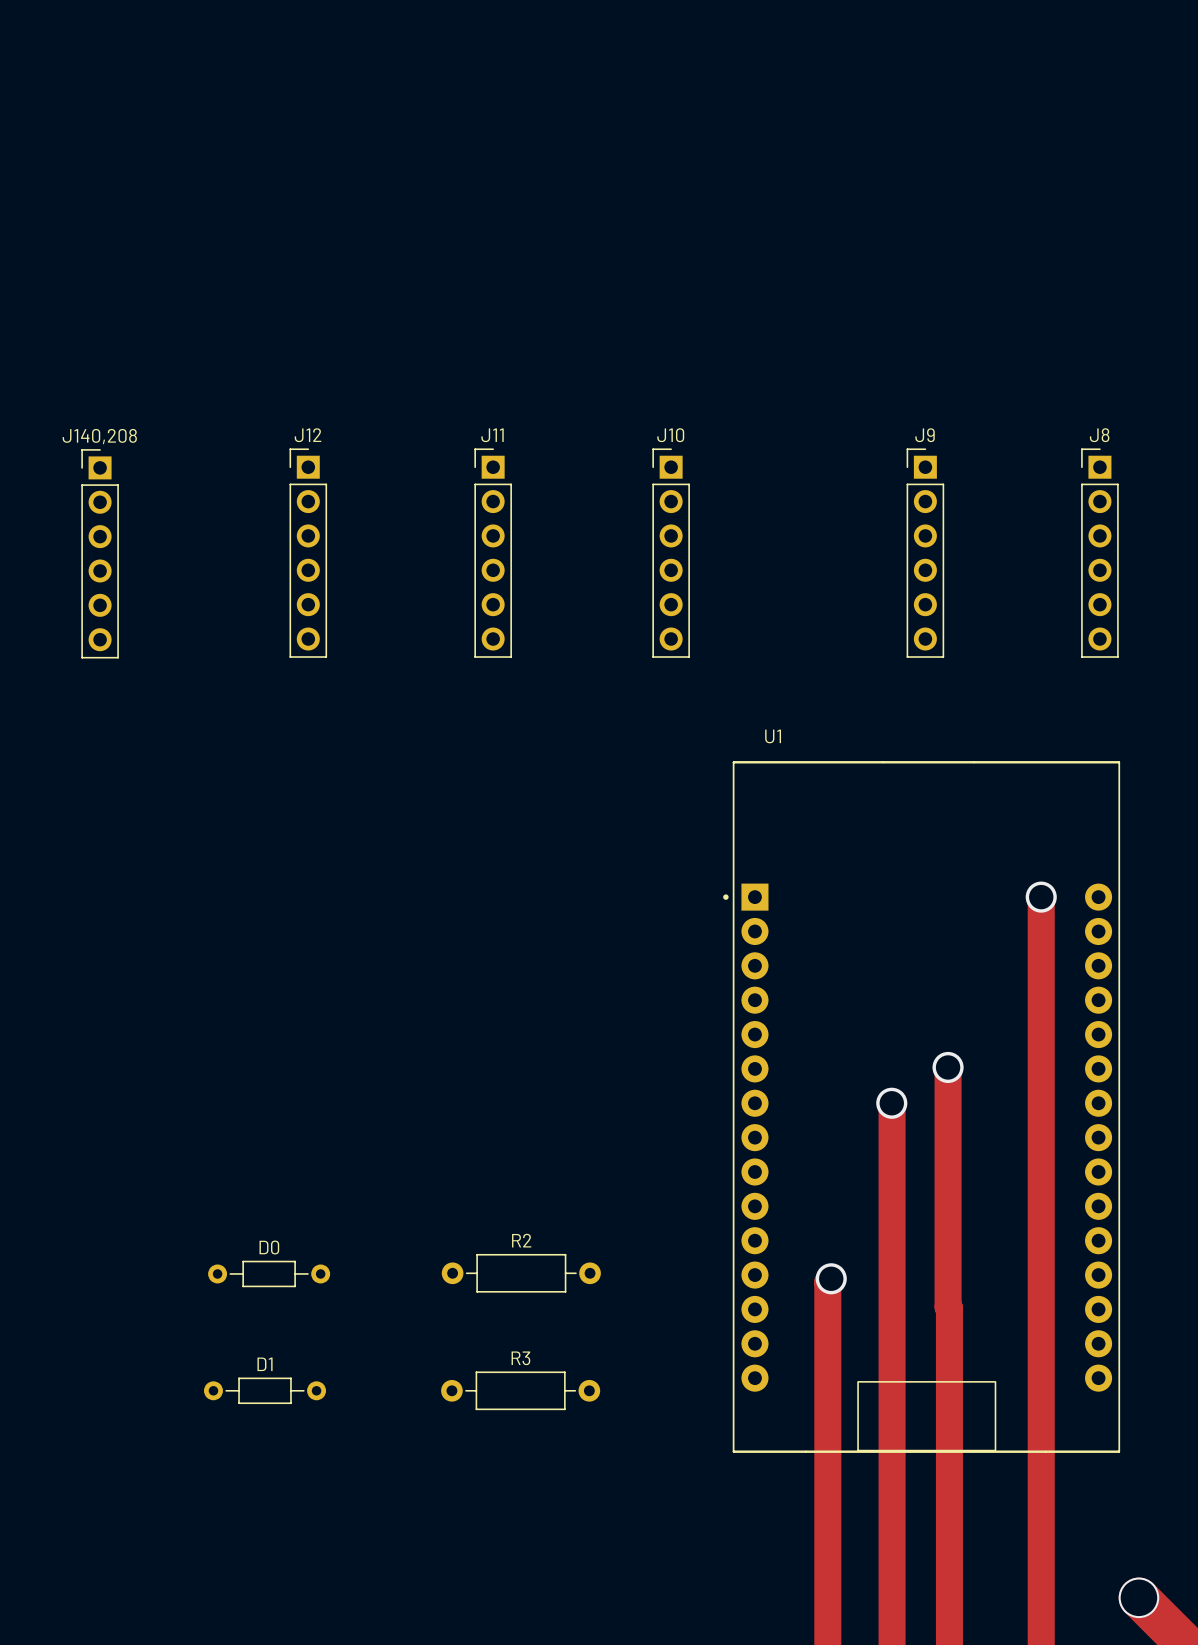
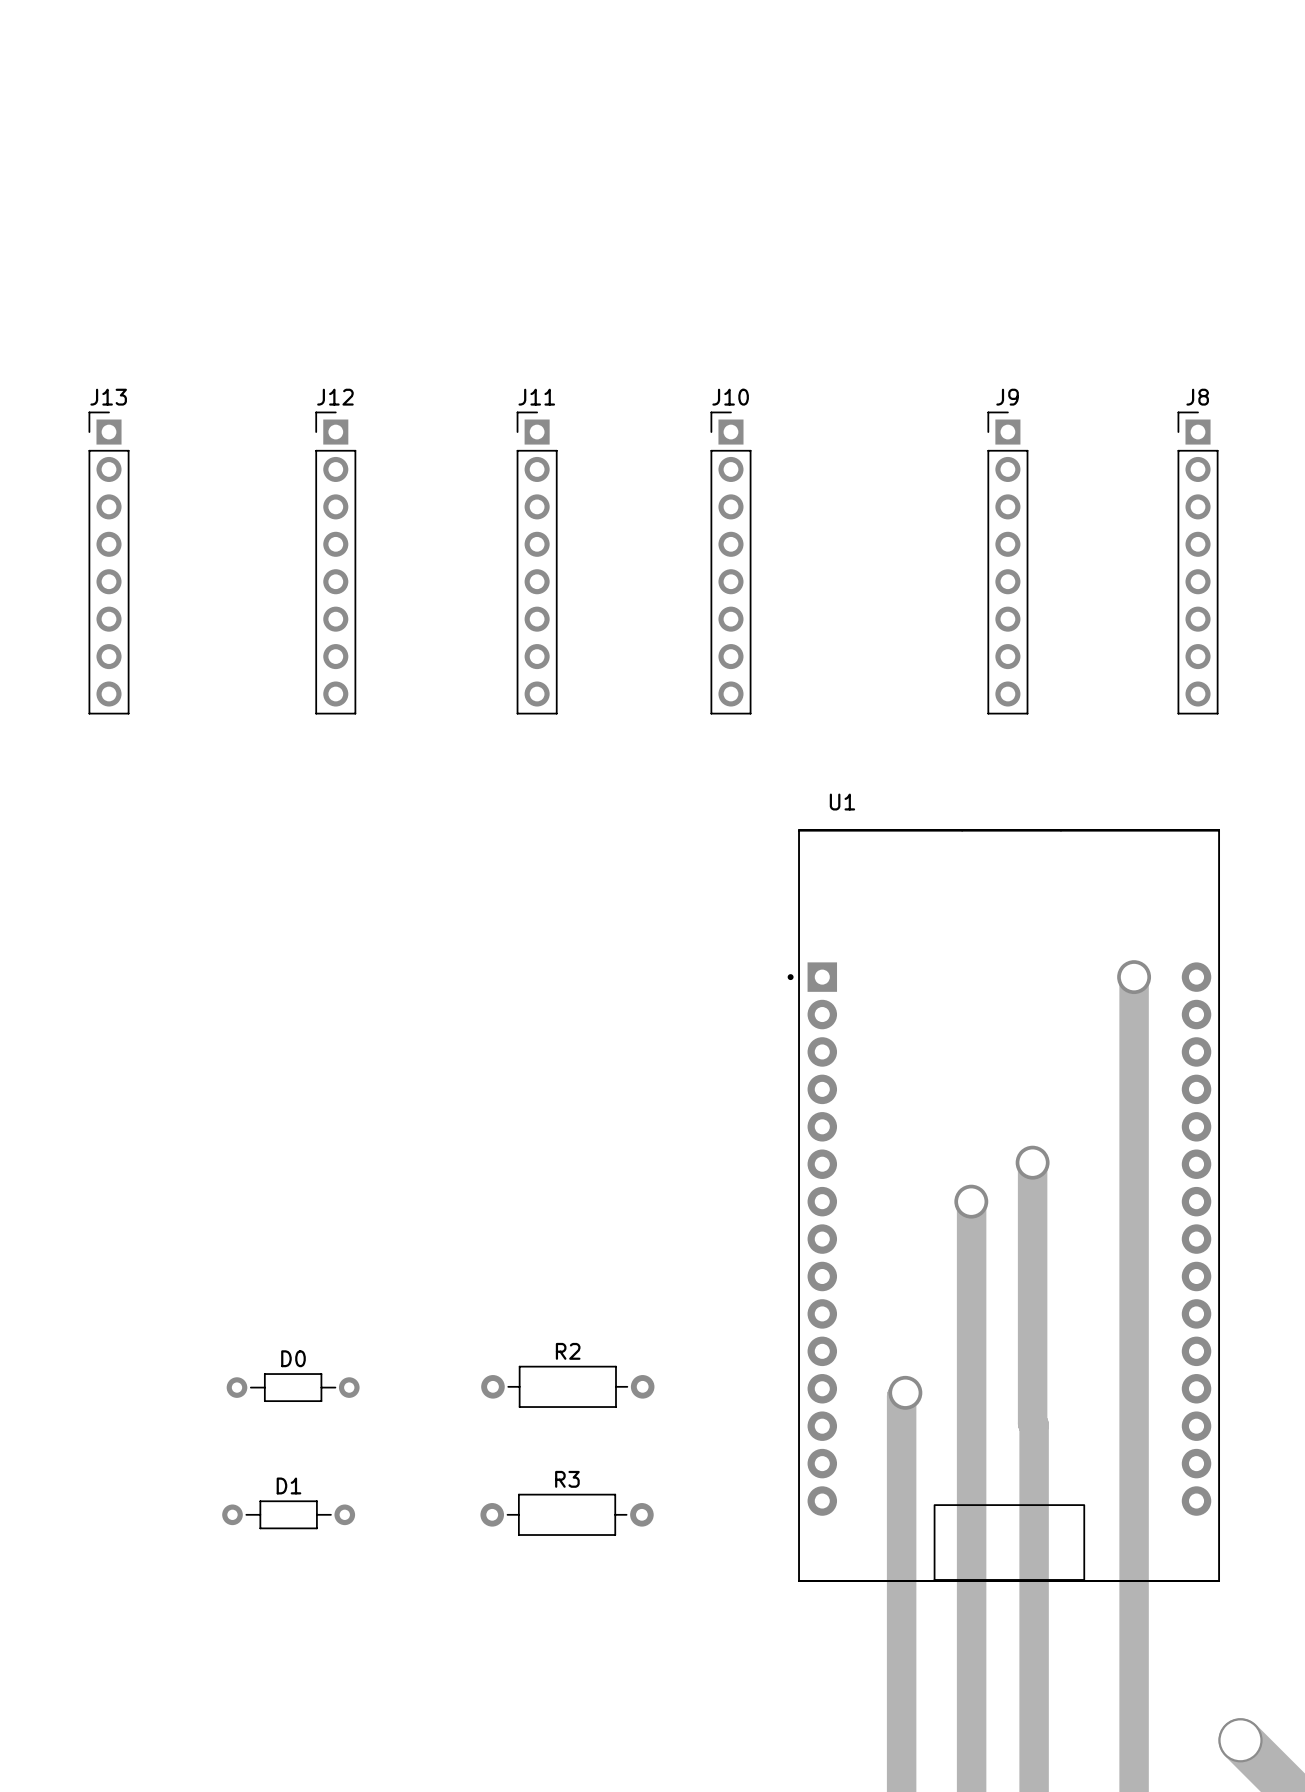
J12 name position: J12 (308, 435) -> J12 (335, 397)
J11 name position: J11 (492, 435) -> J11 (536, 397)
J10 name position: J10 (670, 435) -> J10 (730, 397)
J9 name position: J9 (925, 435) -> J9 (1007, 397)
J8 name position: J8 (1099, 435) -> J8 (1197, 397)
J12 footprint: [289, 448, 328, 658] -> [315, 411, 357, 715]
J11 footprint: [474, 448, 512, 658] -> [516, 411, 558, 715]
J10 footprint: [652, 448, 690, 658] -> [710, 411, 752, 715]
J9 footprint: [906, 448, 945, 658] -> [987, 411, 1029, 715]
J8 footprint: [1081, 448, 1119, 658] -> [1177, 411, 1219, 715]
J13: none -> (109, 563)
J140,208: (100, 553) -> none

